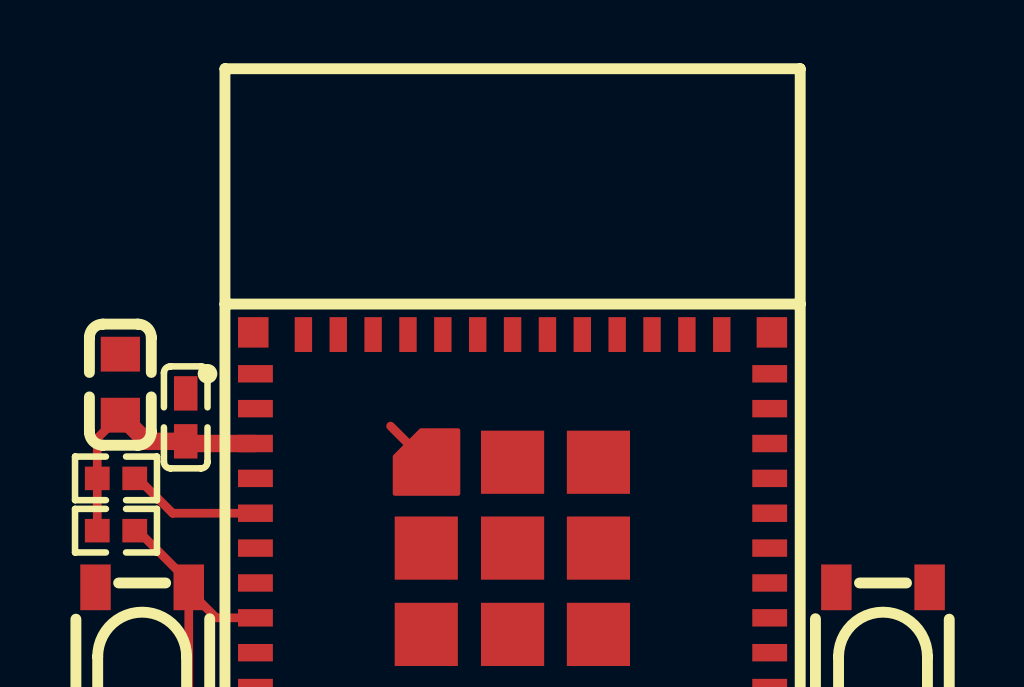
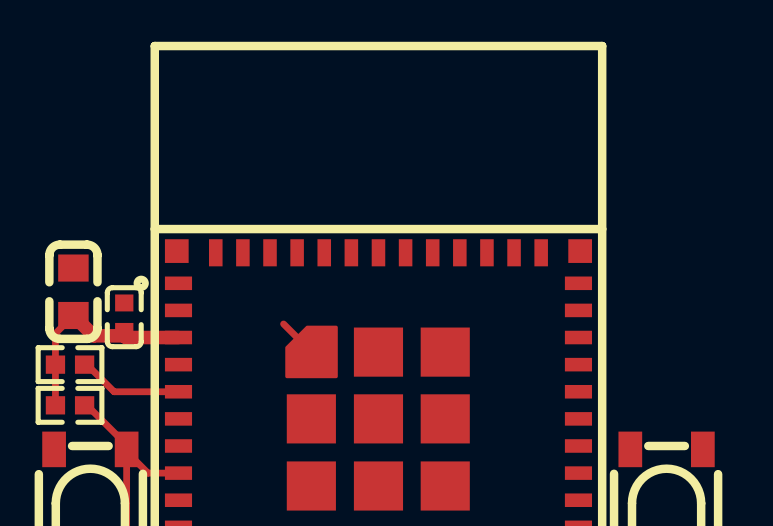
part footprint: [160, 363, 211, 472] -> [104, 285, 144, 350]

